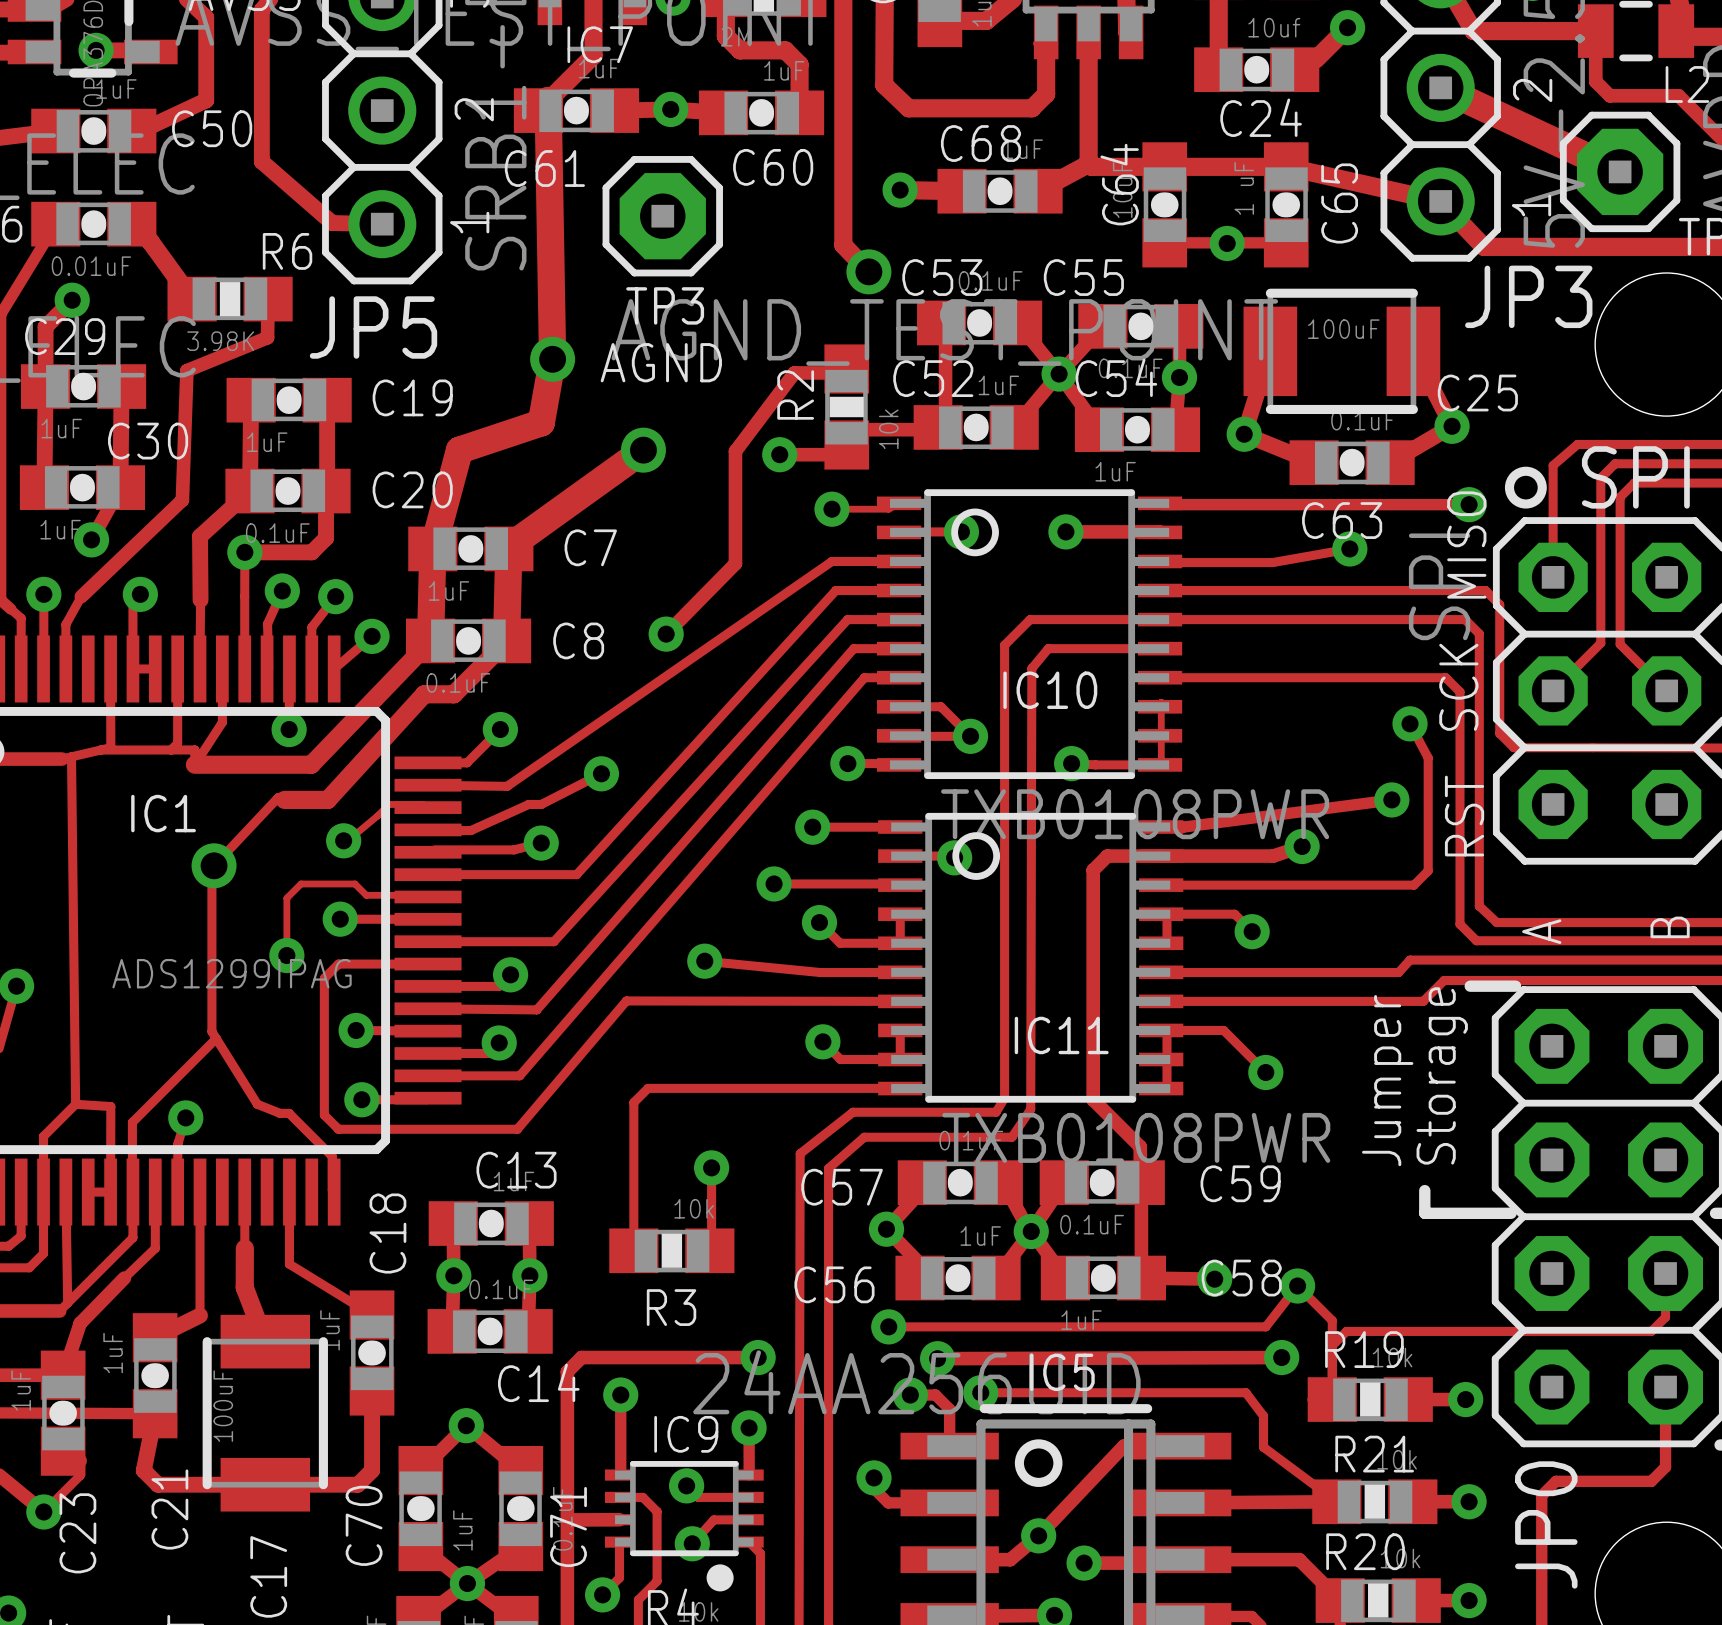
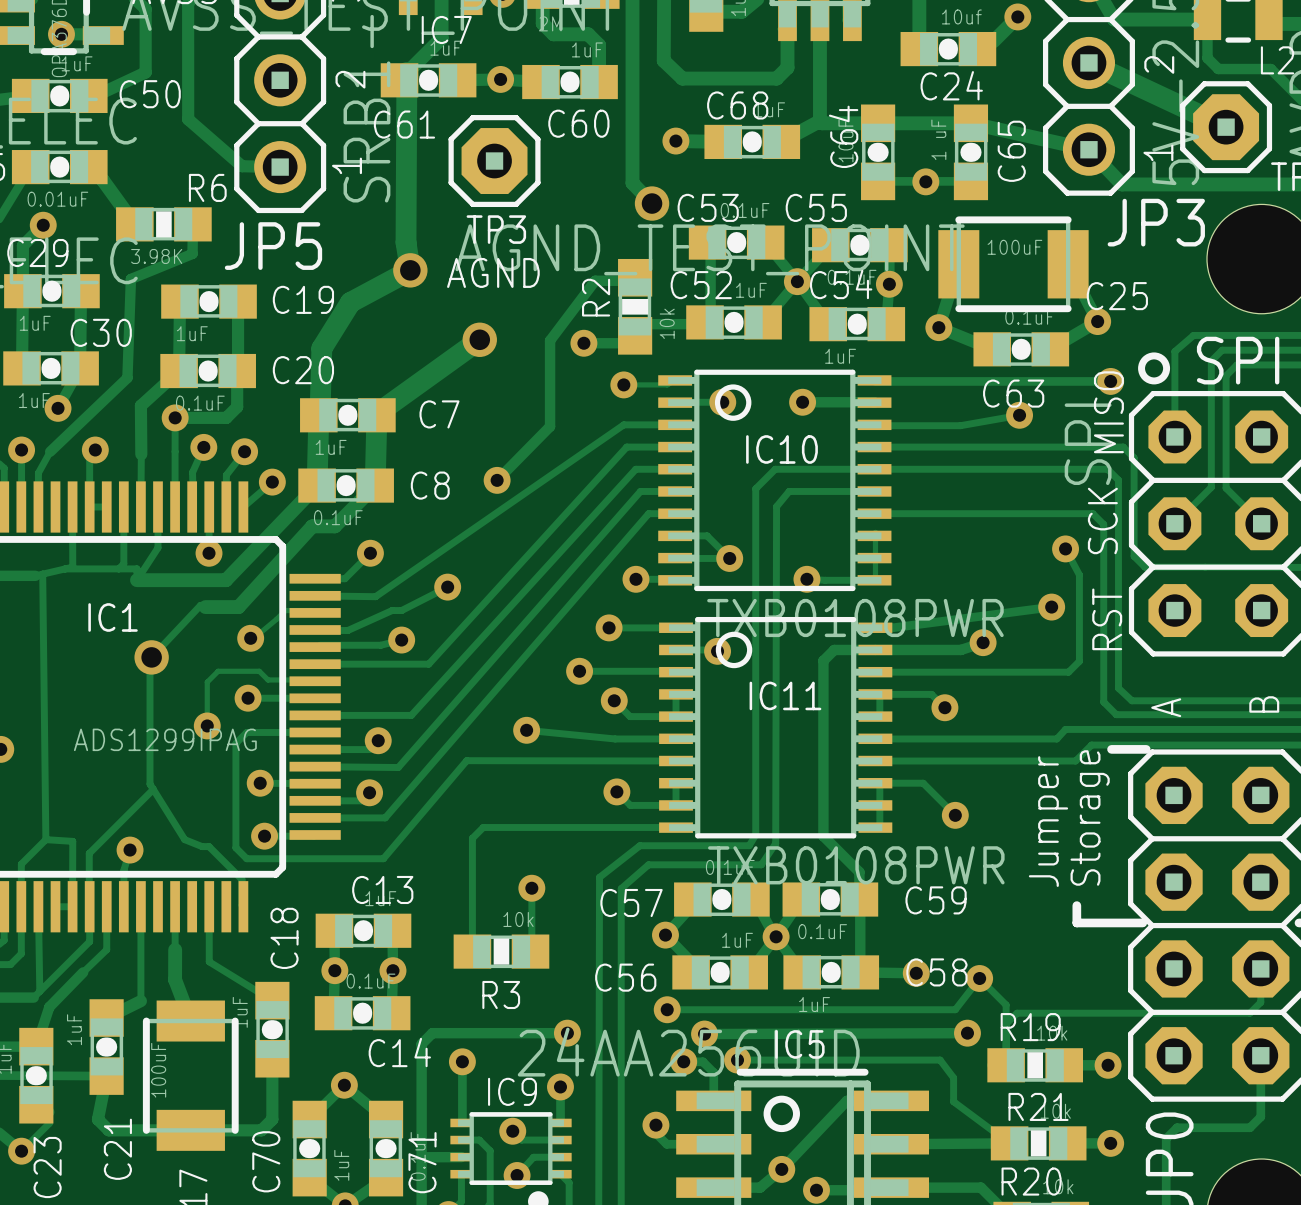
track: (548, 100) (552, 359) (541, 422) (459, 450) (434, 543) -> (406, 72) (406, 242) (410, 270) (350, 302) (321, 348) (320, 410)
IC10 name position: IC10 (1050, 690) -> IC10 (782, 449)
IC11 name position: IC11 (1061, 1035) -> IC11 (785, 695)

